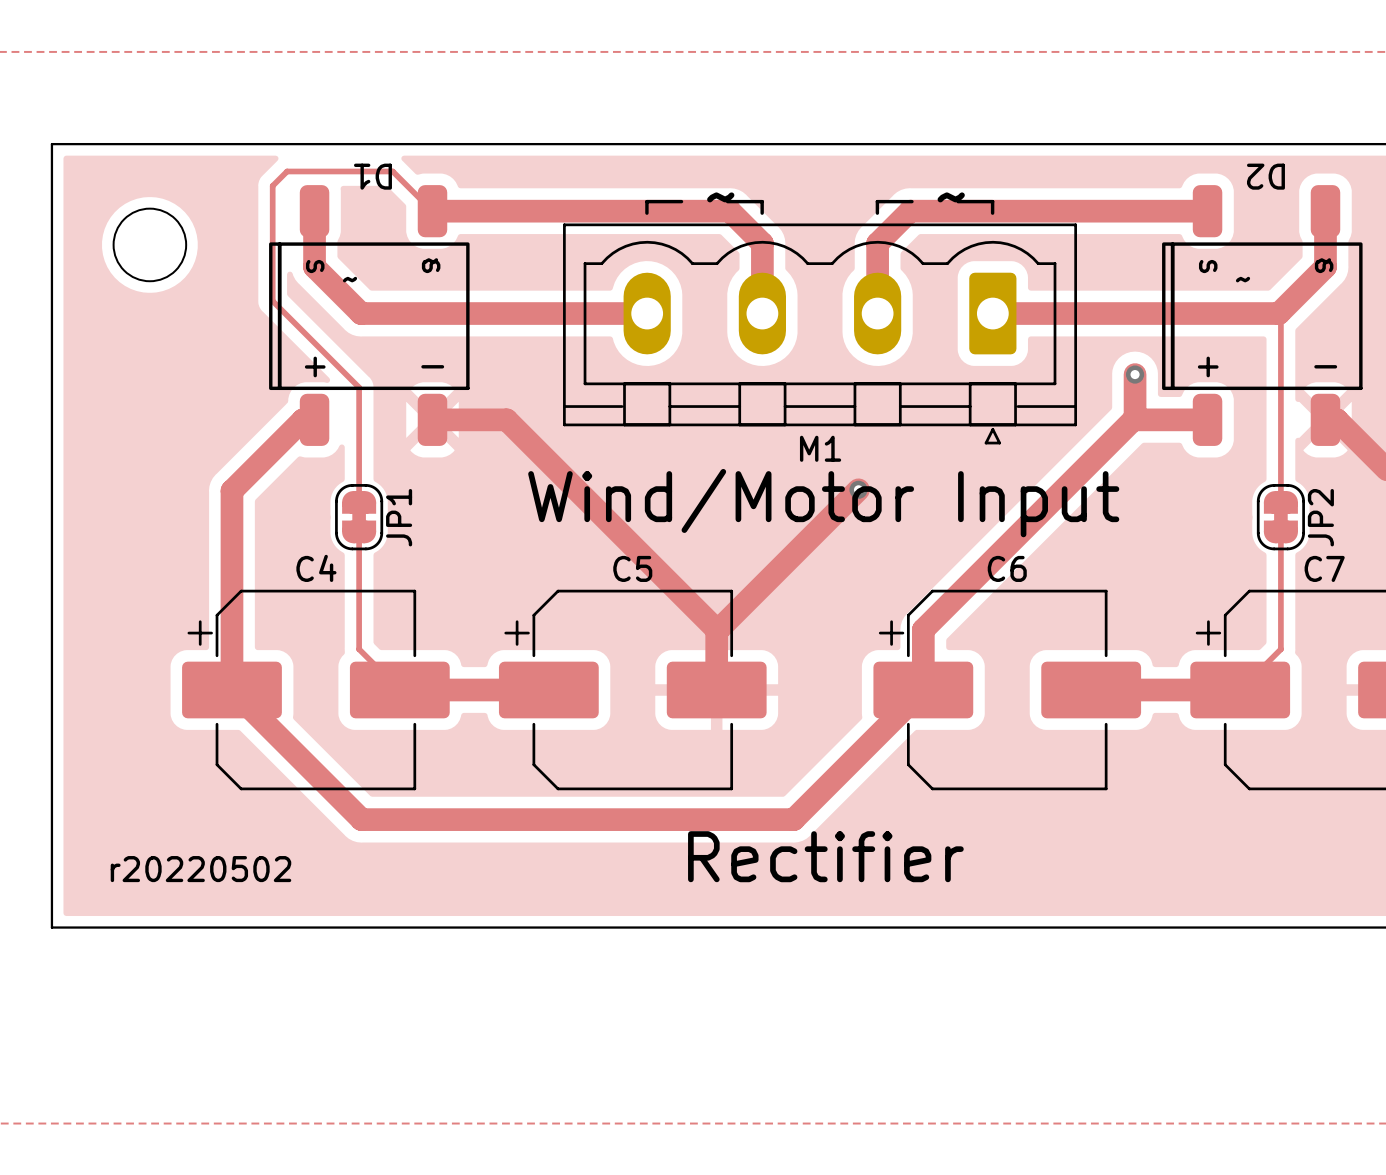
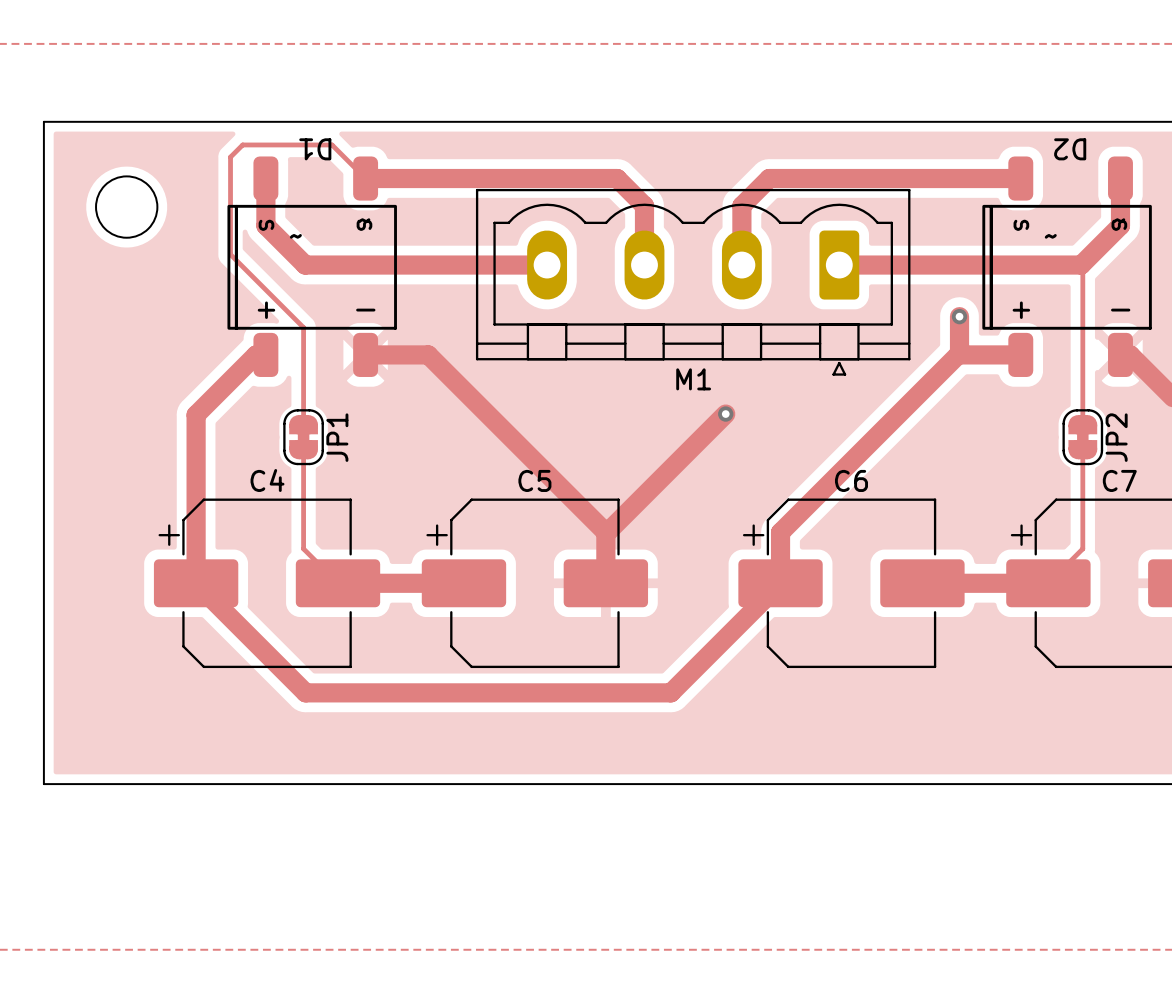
text: ~ (720, 197) -> none
text: ~ (951, 197) -> none
line: (681, 201) (646, 201) (646, 213) -> none
line: (727, 201) (762, 201) (762, 213) -> none
line: (911, 201) (877, 201) (877, 213) -> none
line: (958, 201) (992, 201) (992, 213) -> none
text: Wind/Motor Input (823, 503) -> none
text: Rectifier (825, 856) -> none
text: r20220502 (200, 869) -> none

